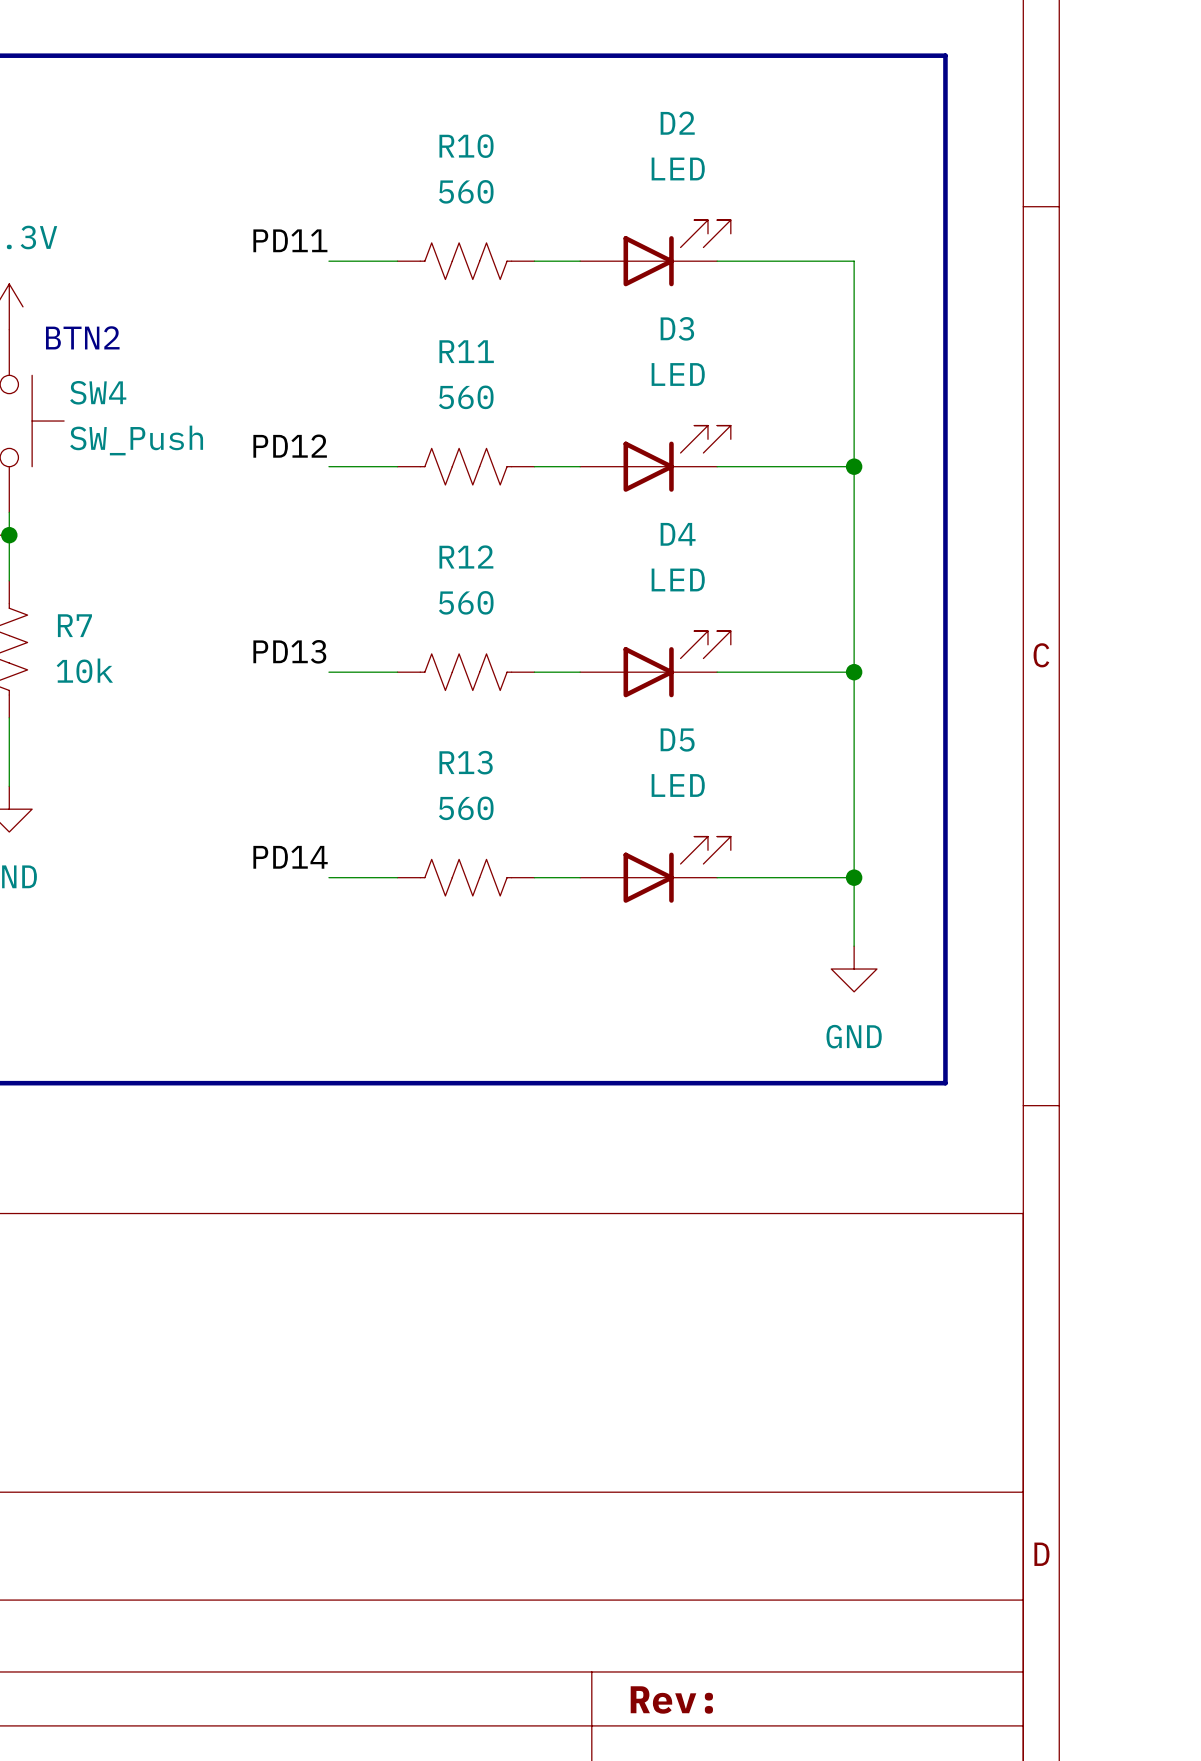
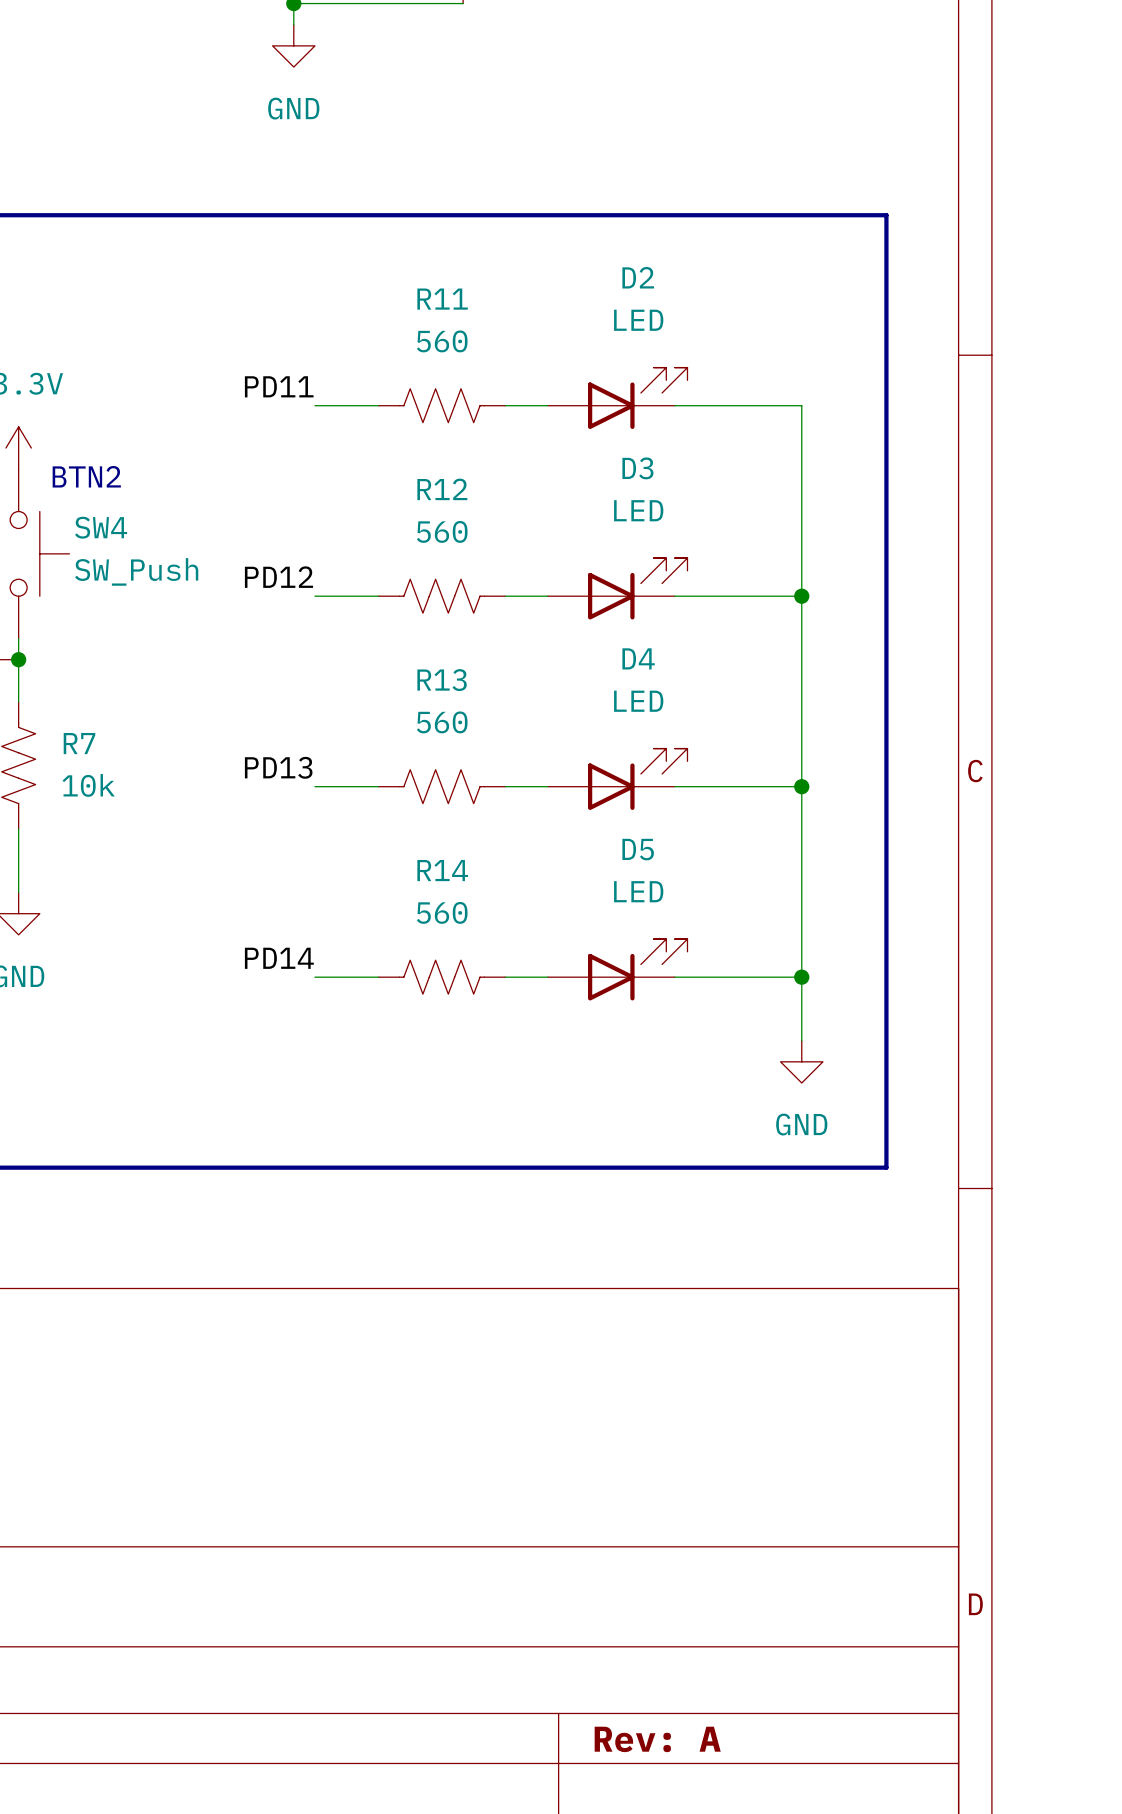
R10 name: R10 (466, 146) -> R11 (442, 299)
R11 name: R11 (466, 351) -> R12 (442, 489)
R12 name: R12 (466, 556) -> R13 (442, 680)
R13 name: R13 (466, 762) -> R14 (442, 870)
title block: Rev: (671, 1699) -> Rev: A (657, 1739)

